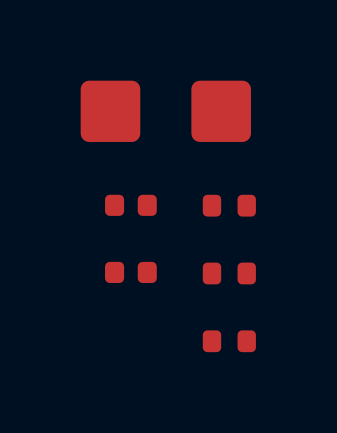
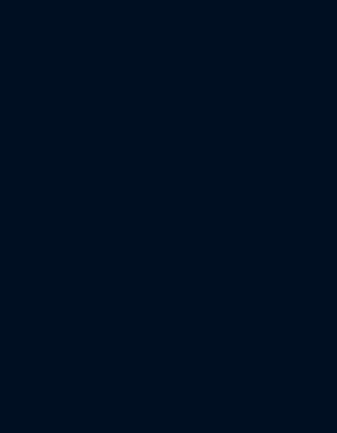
part: (165, 111) -> none
part: (130, 205) -> none
part: (229, 205) -> none
part: (130, 272) -> none
part: (229, 273) -> none
part: (229, 341) -> none

